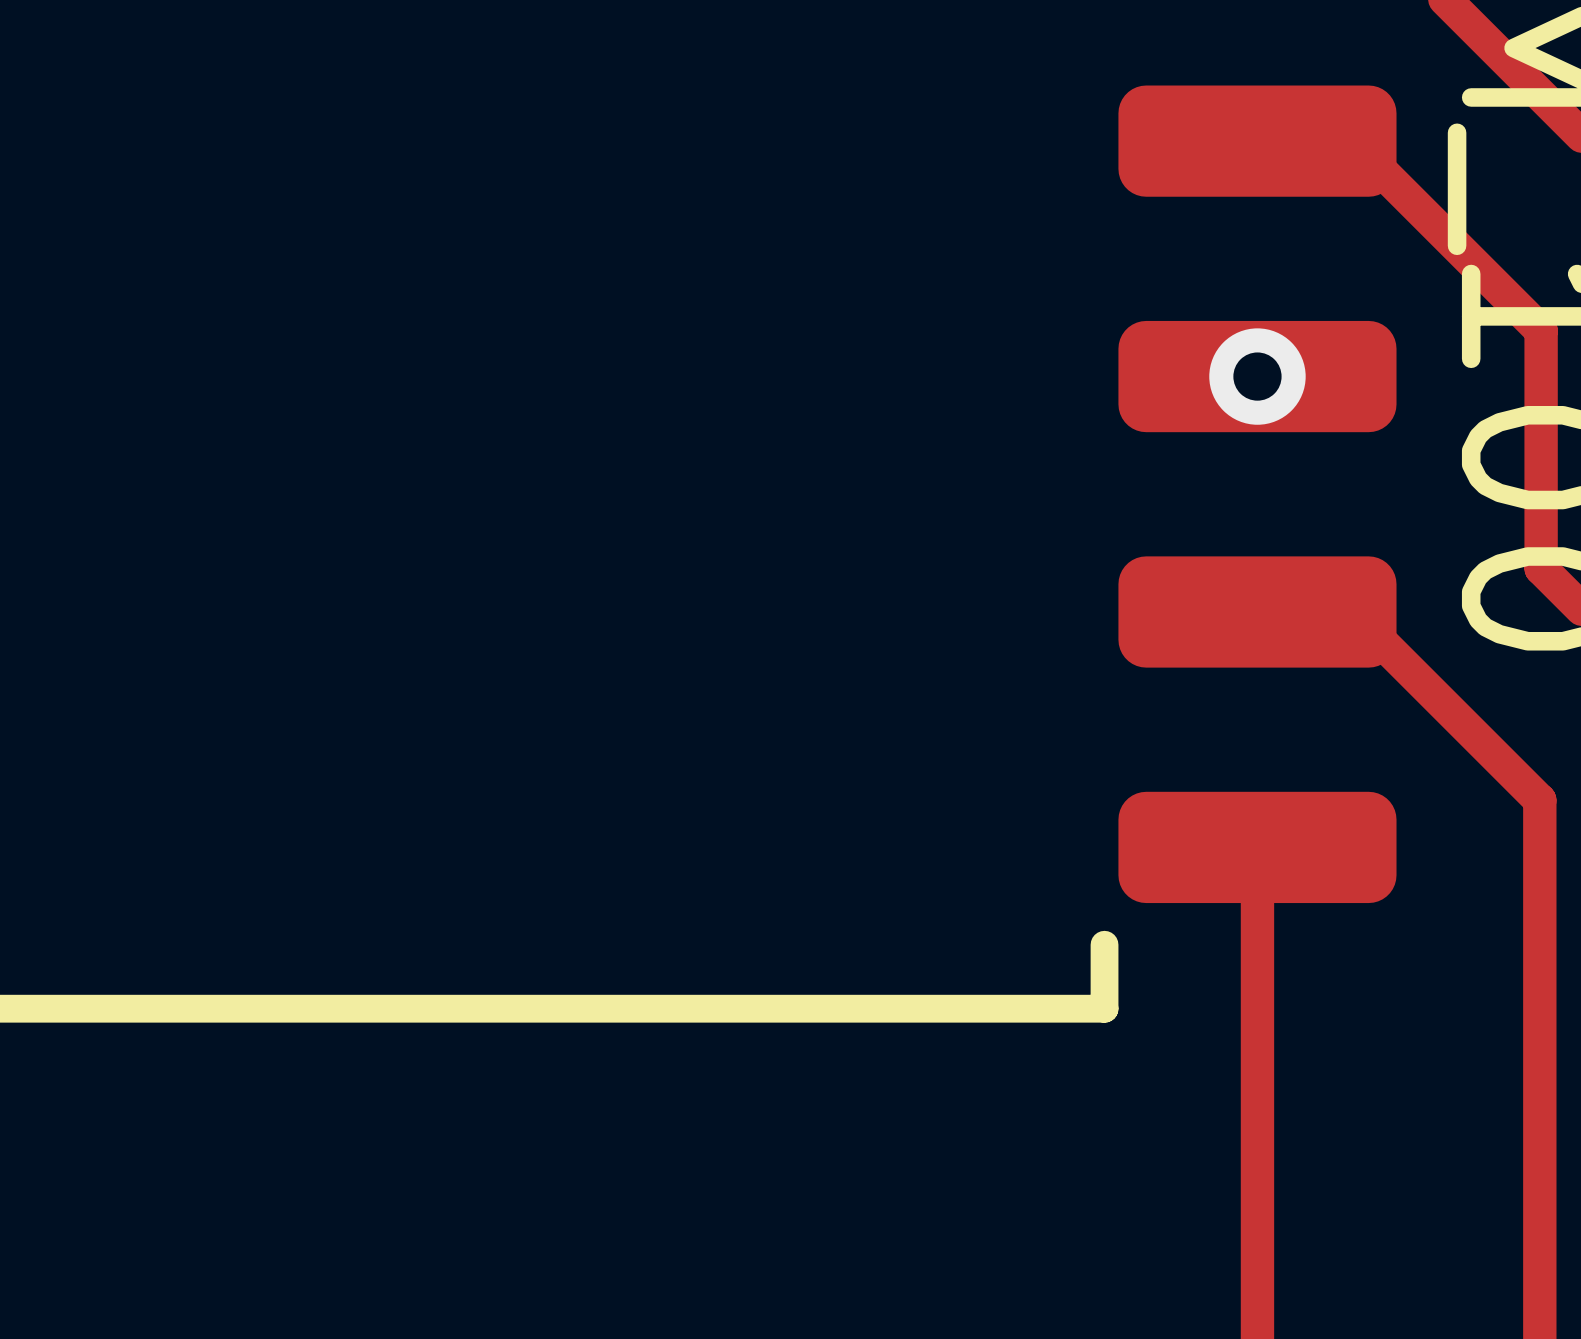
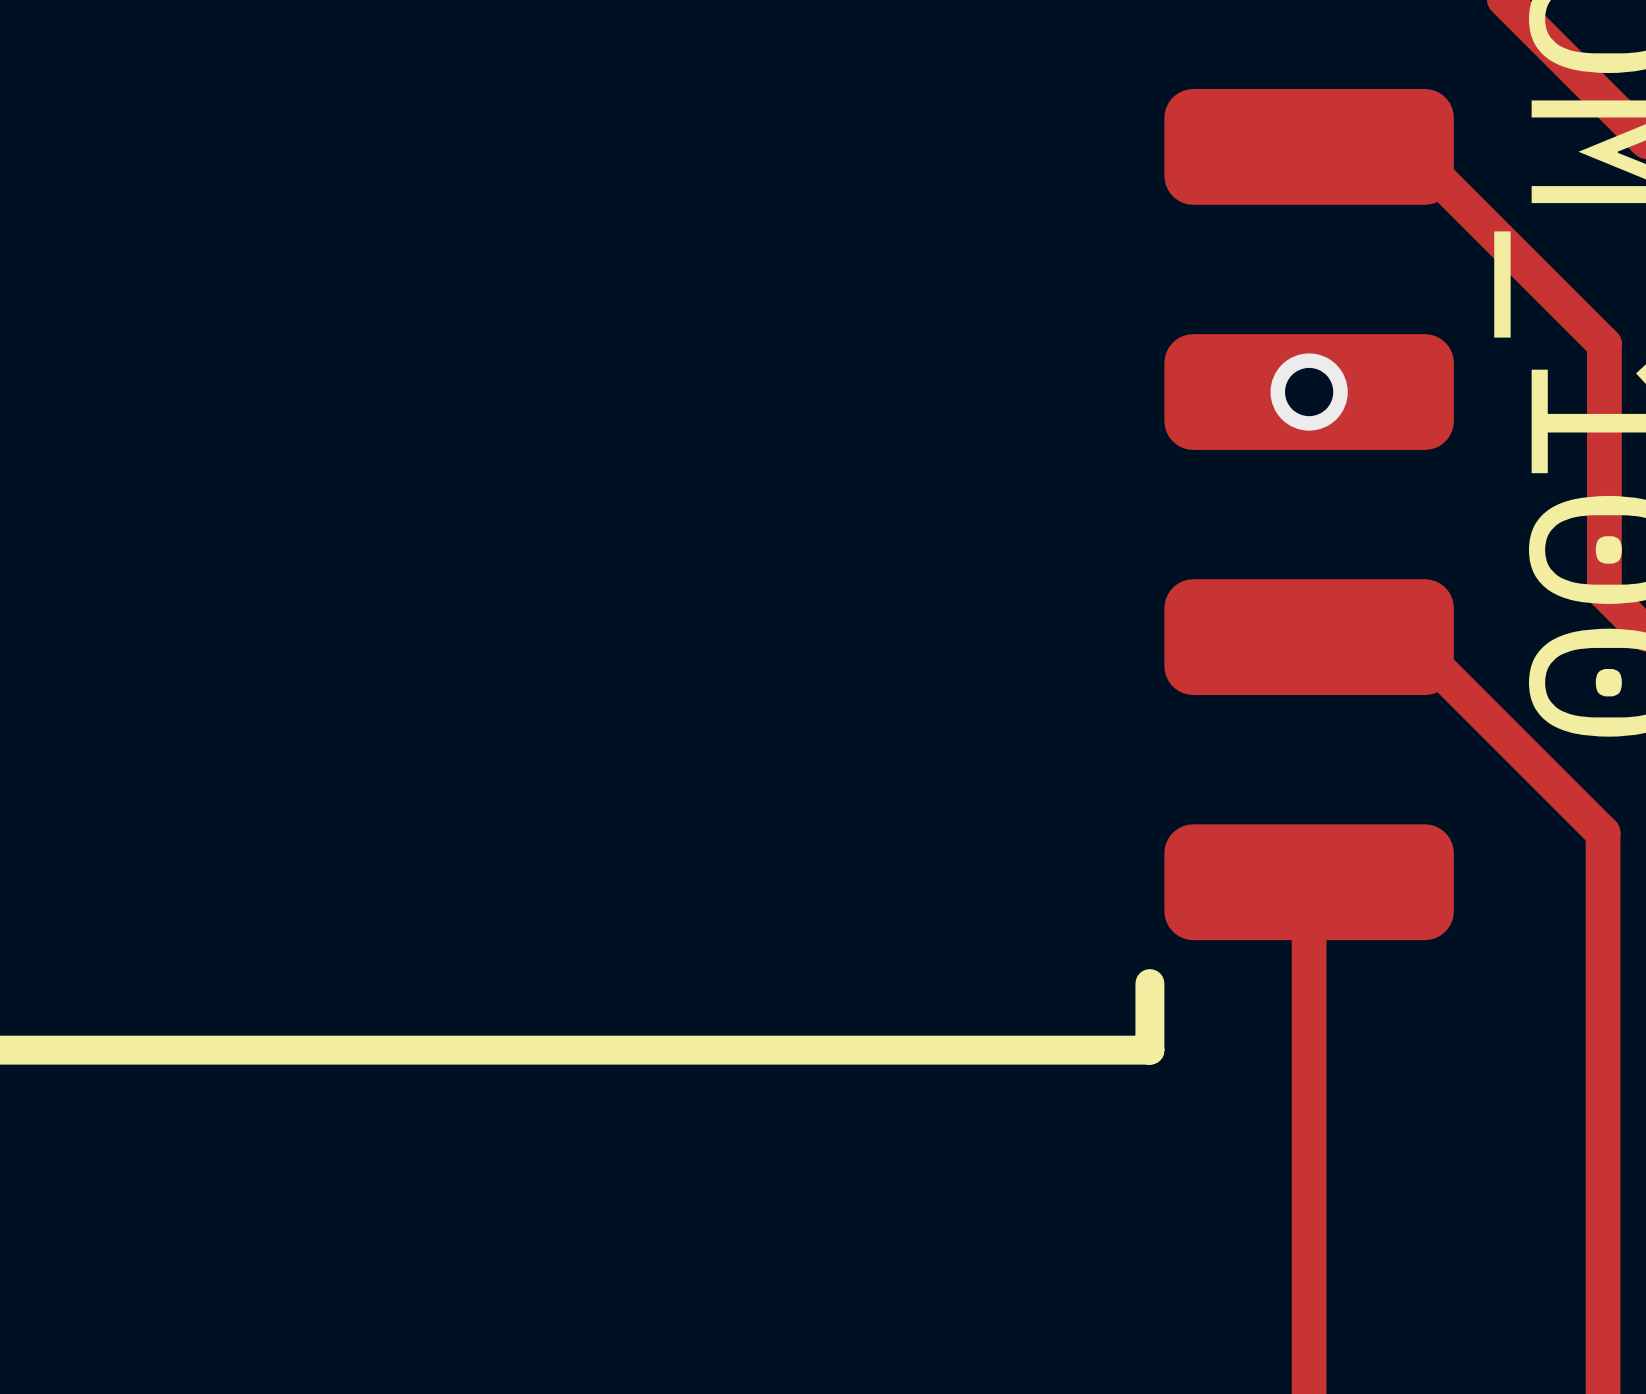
via size: [1209, 328, 1306, 425] -> [1270, 353, 1348, 431]

